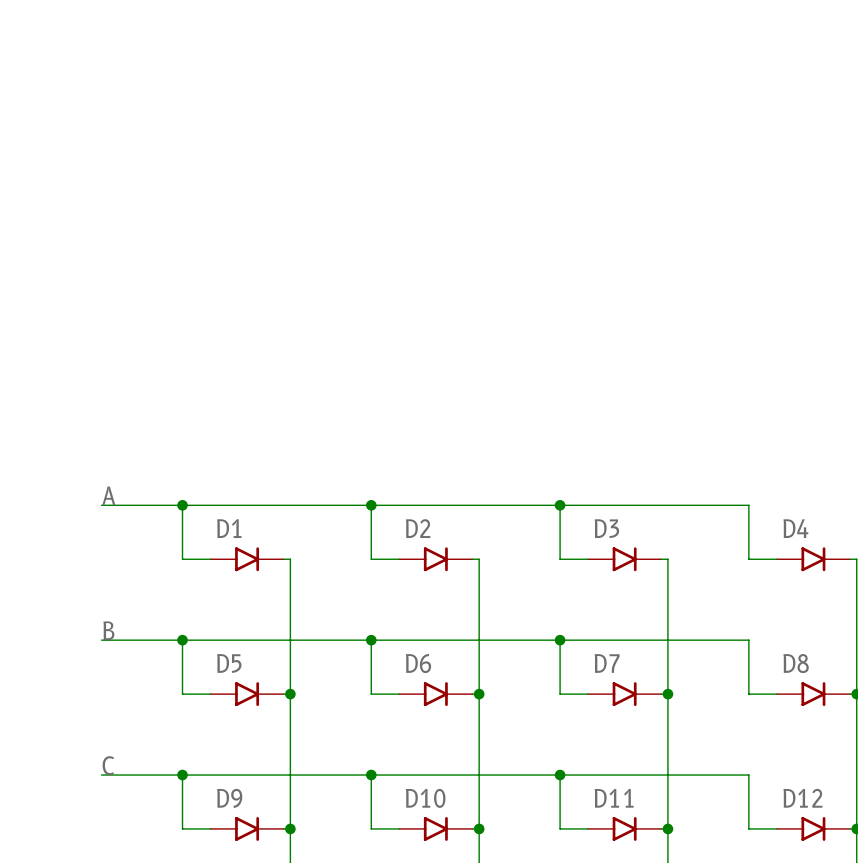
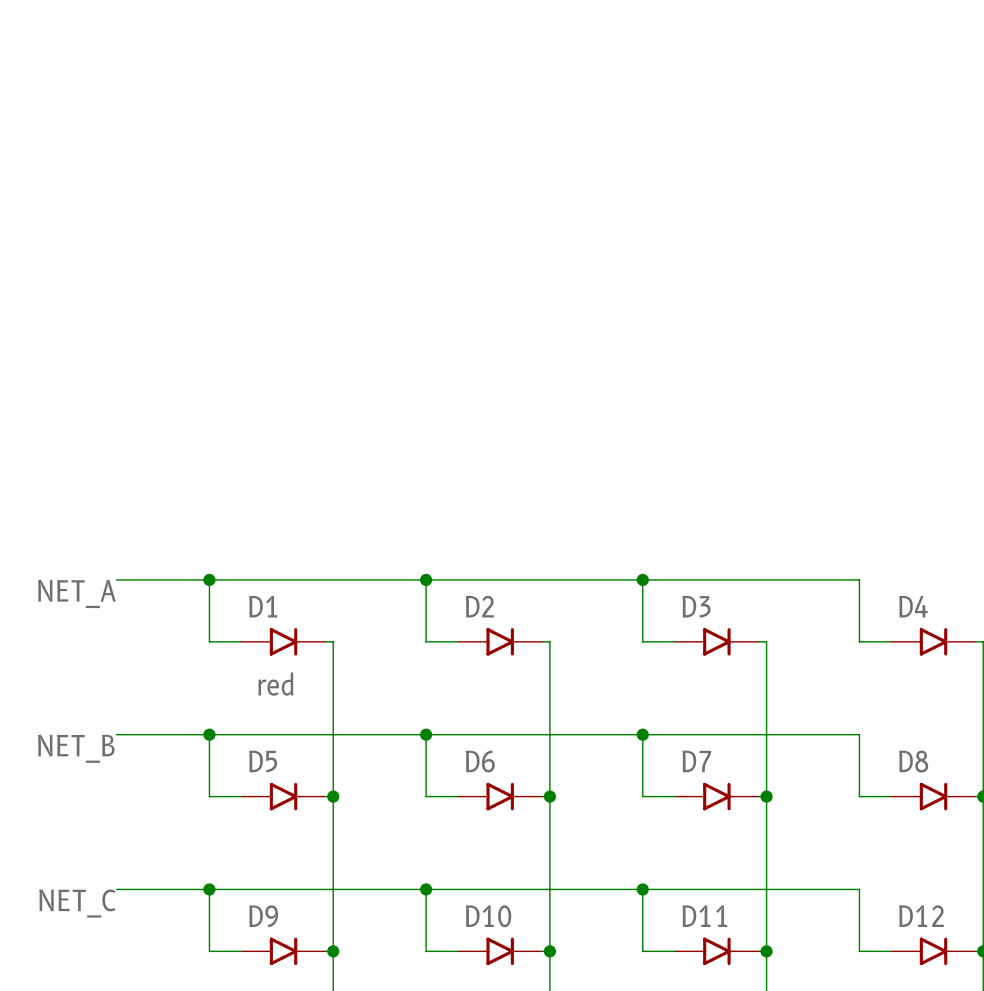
label: A (108, 495) -> NET_A (76, 594)
D1 value: none -> red (275, 684)
label: B (108, 630) -> NET_B (76, 748)
label: C (108, 765) -> NET_C (77, 903)

